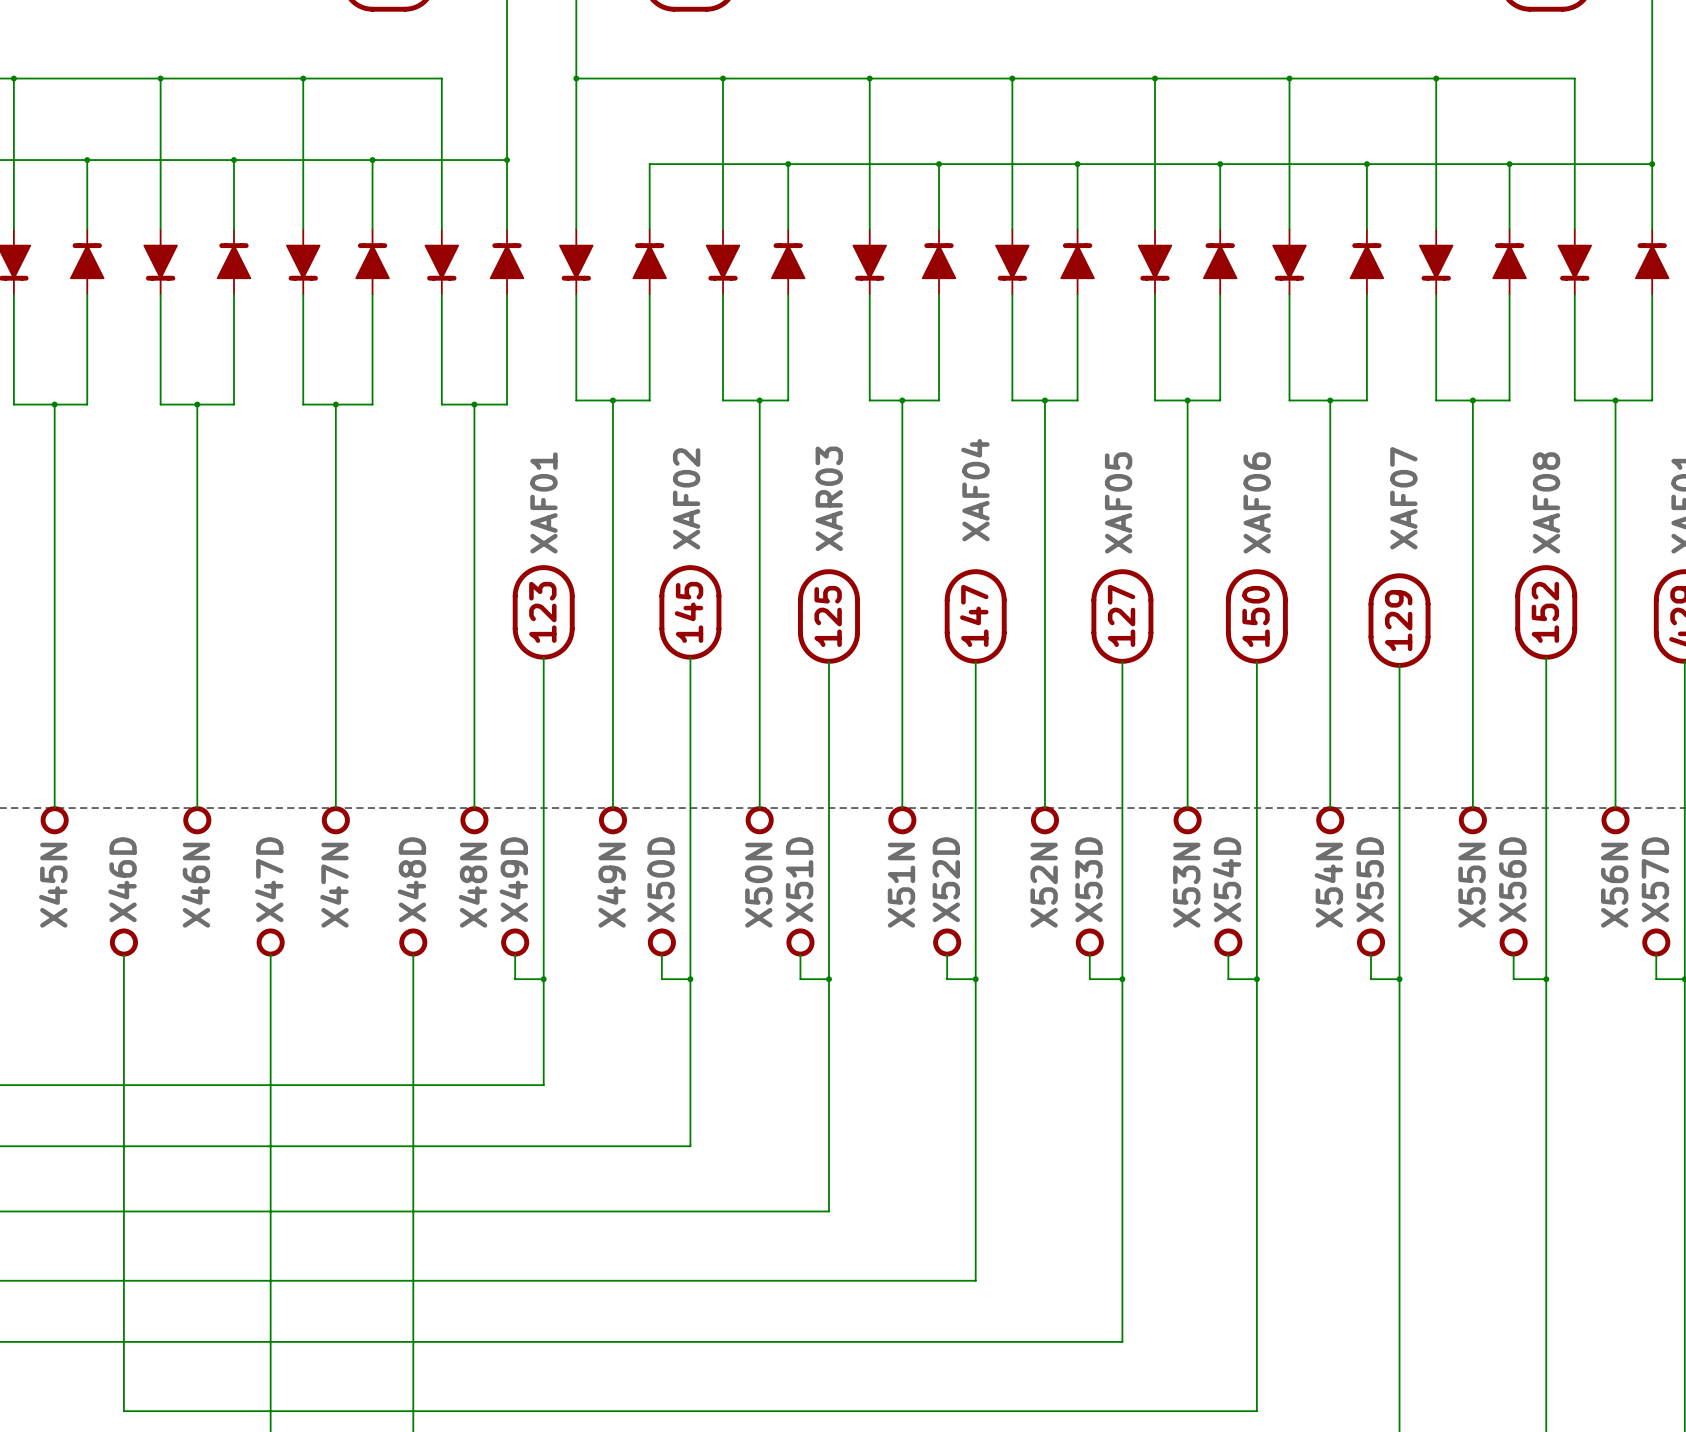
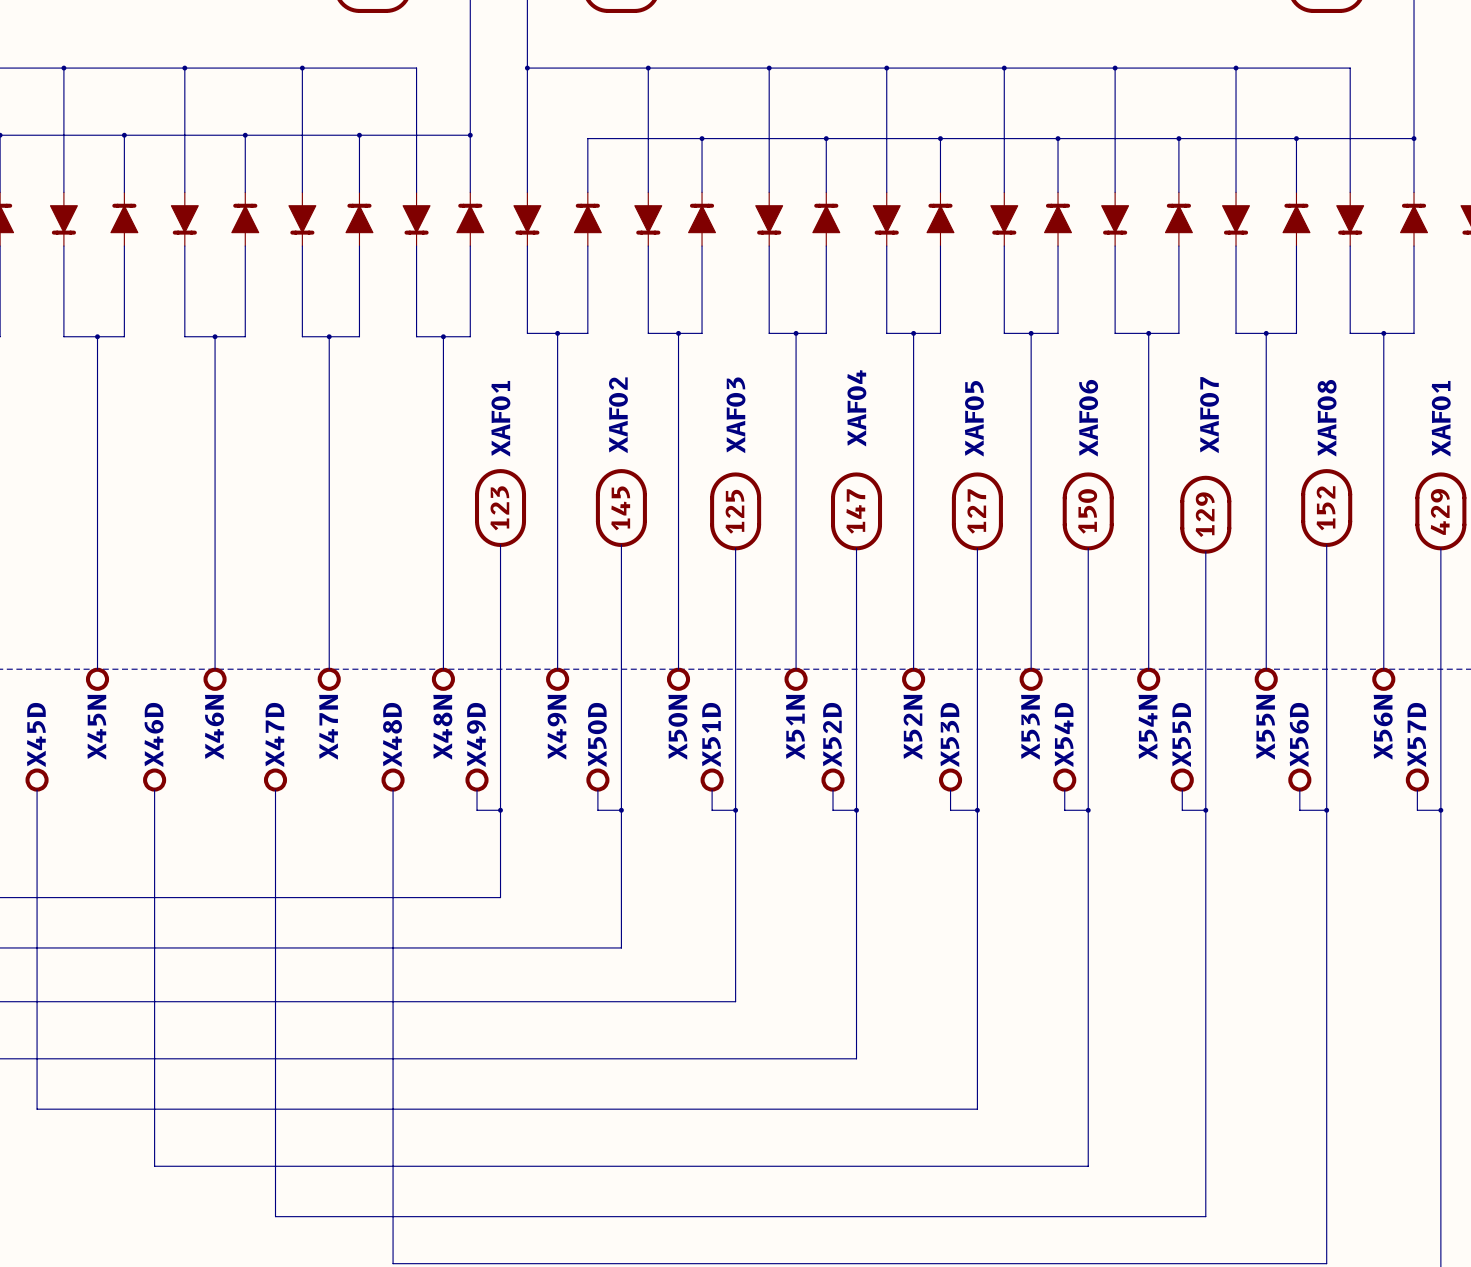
part text: XAR03 (829, 498) -> XAF03 (735, 415)

